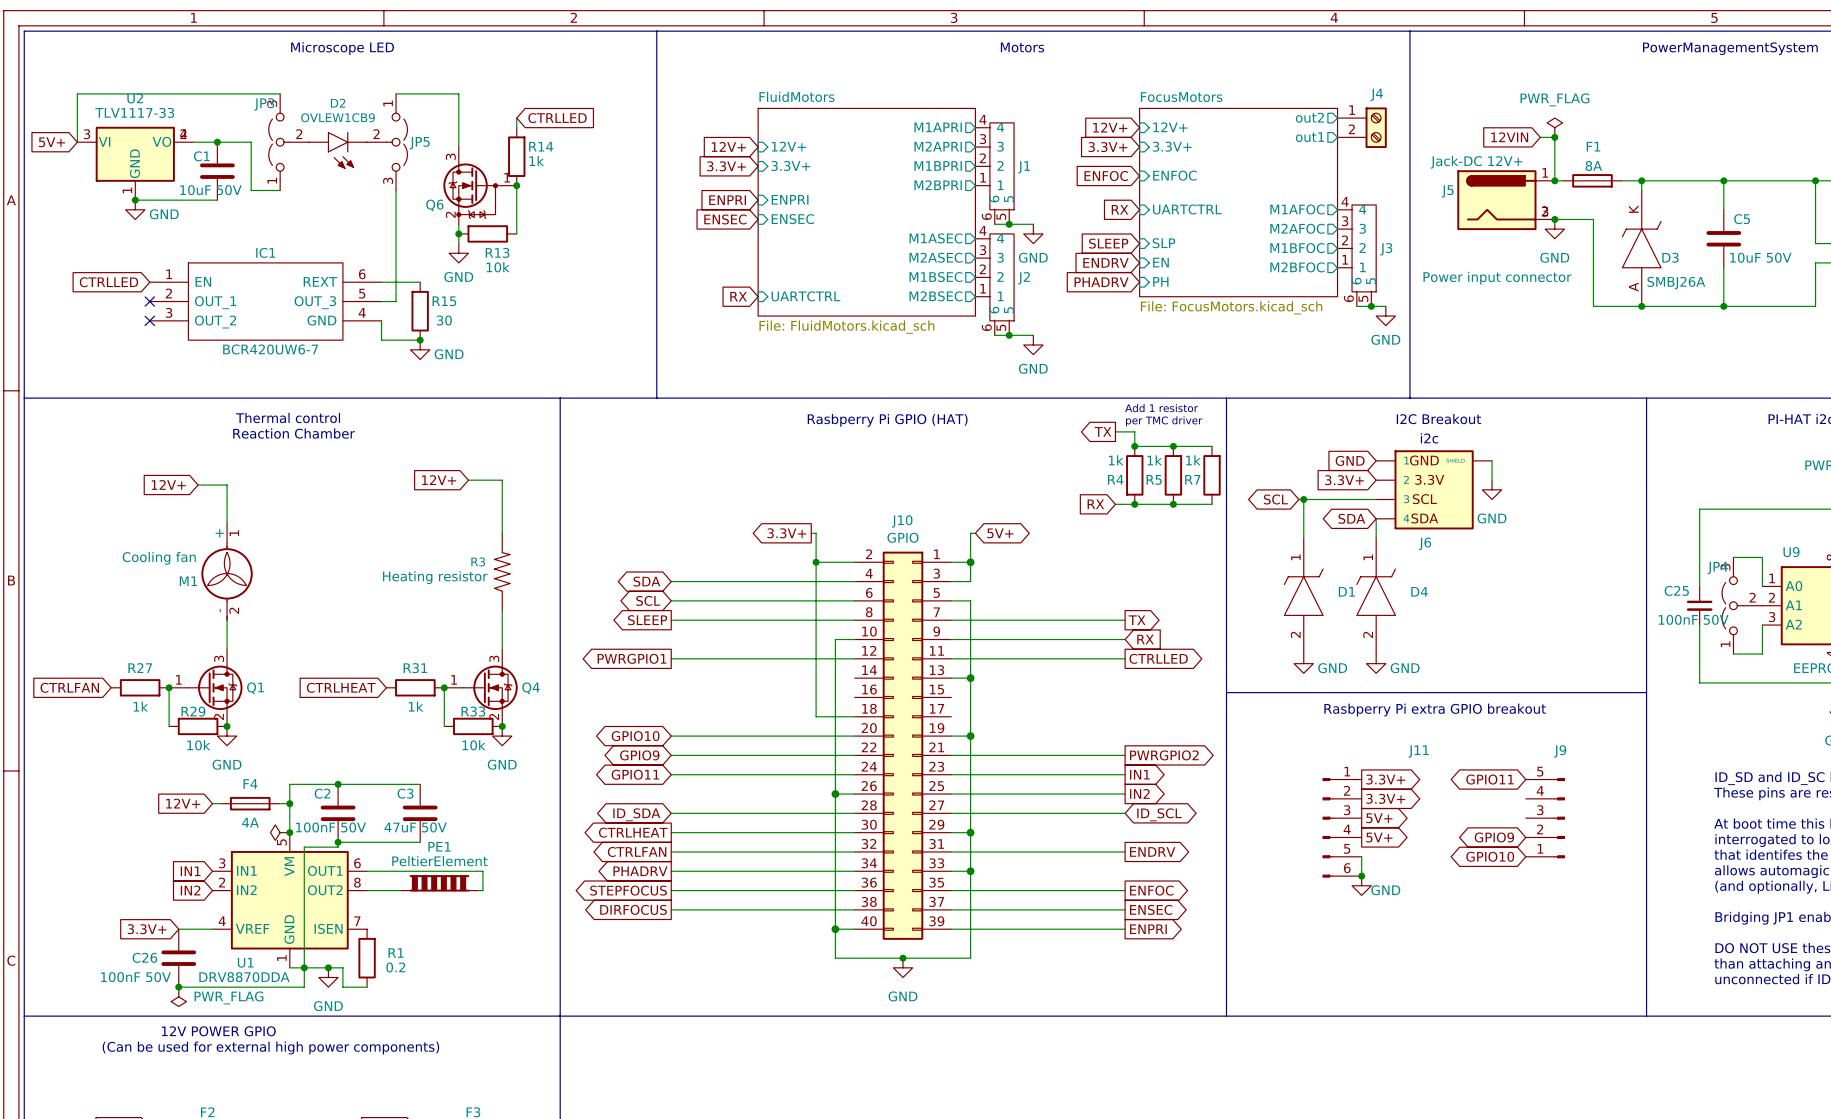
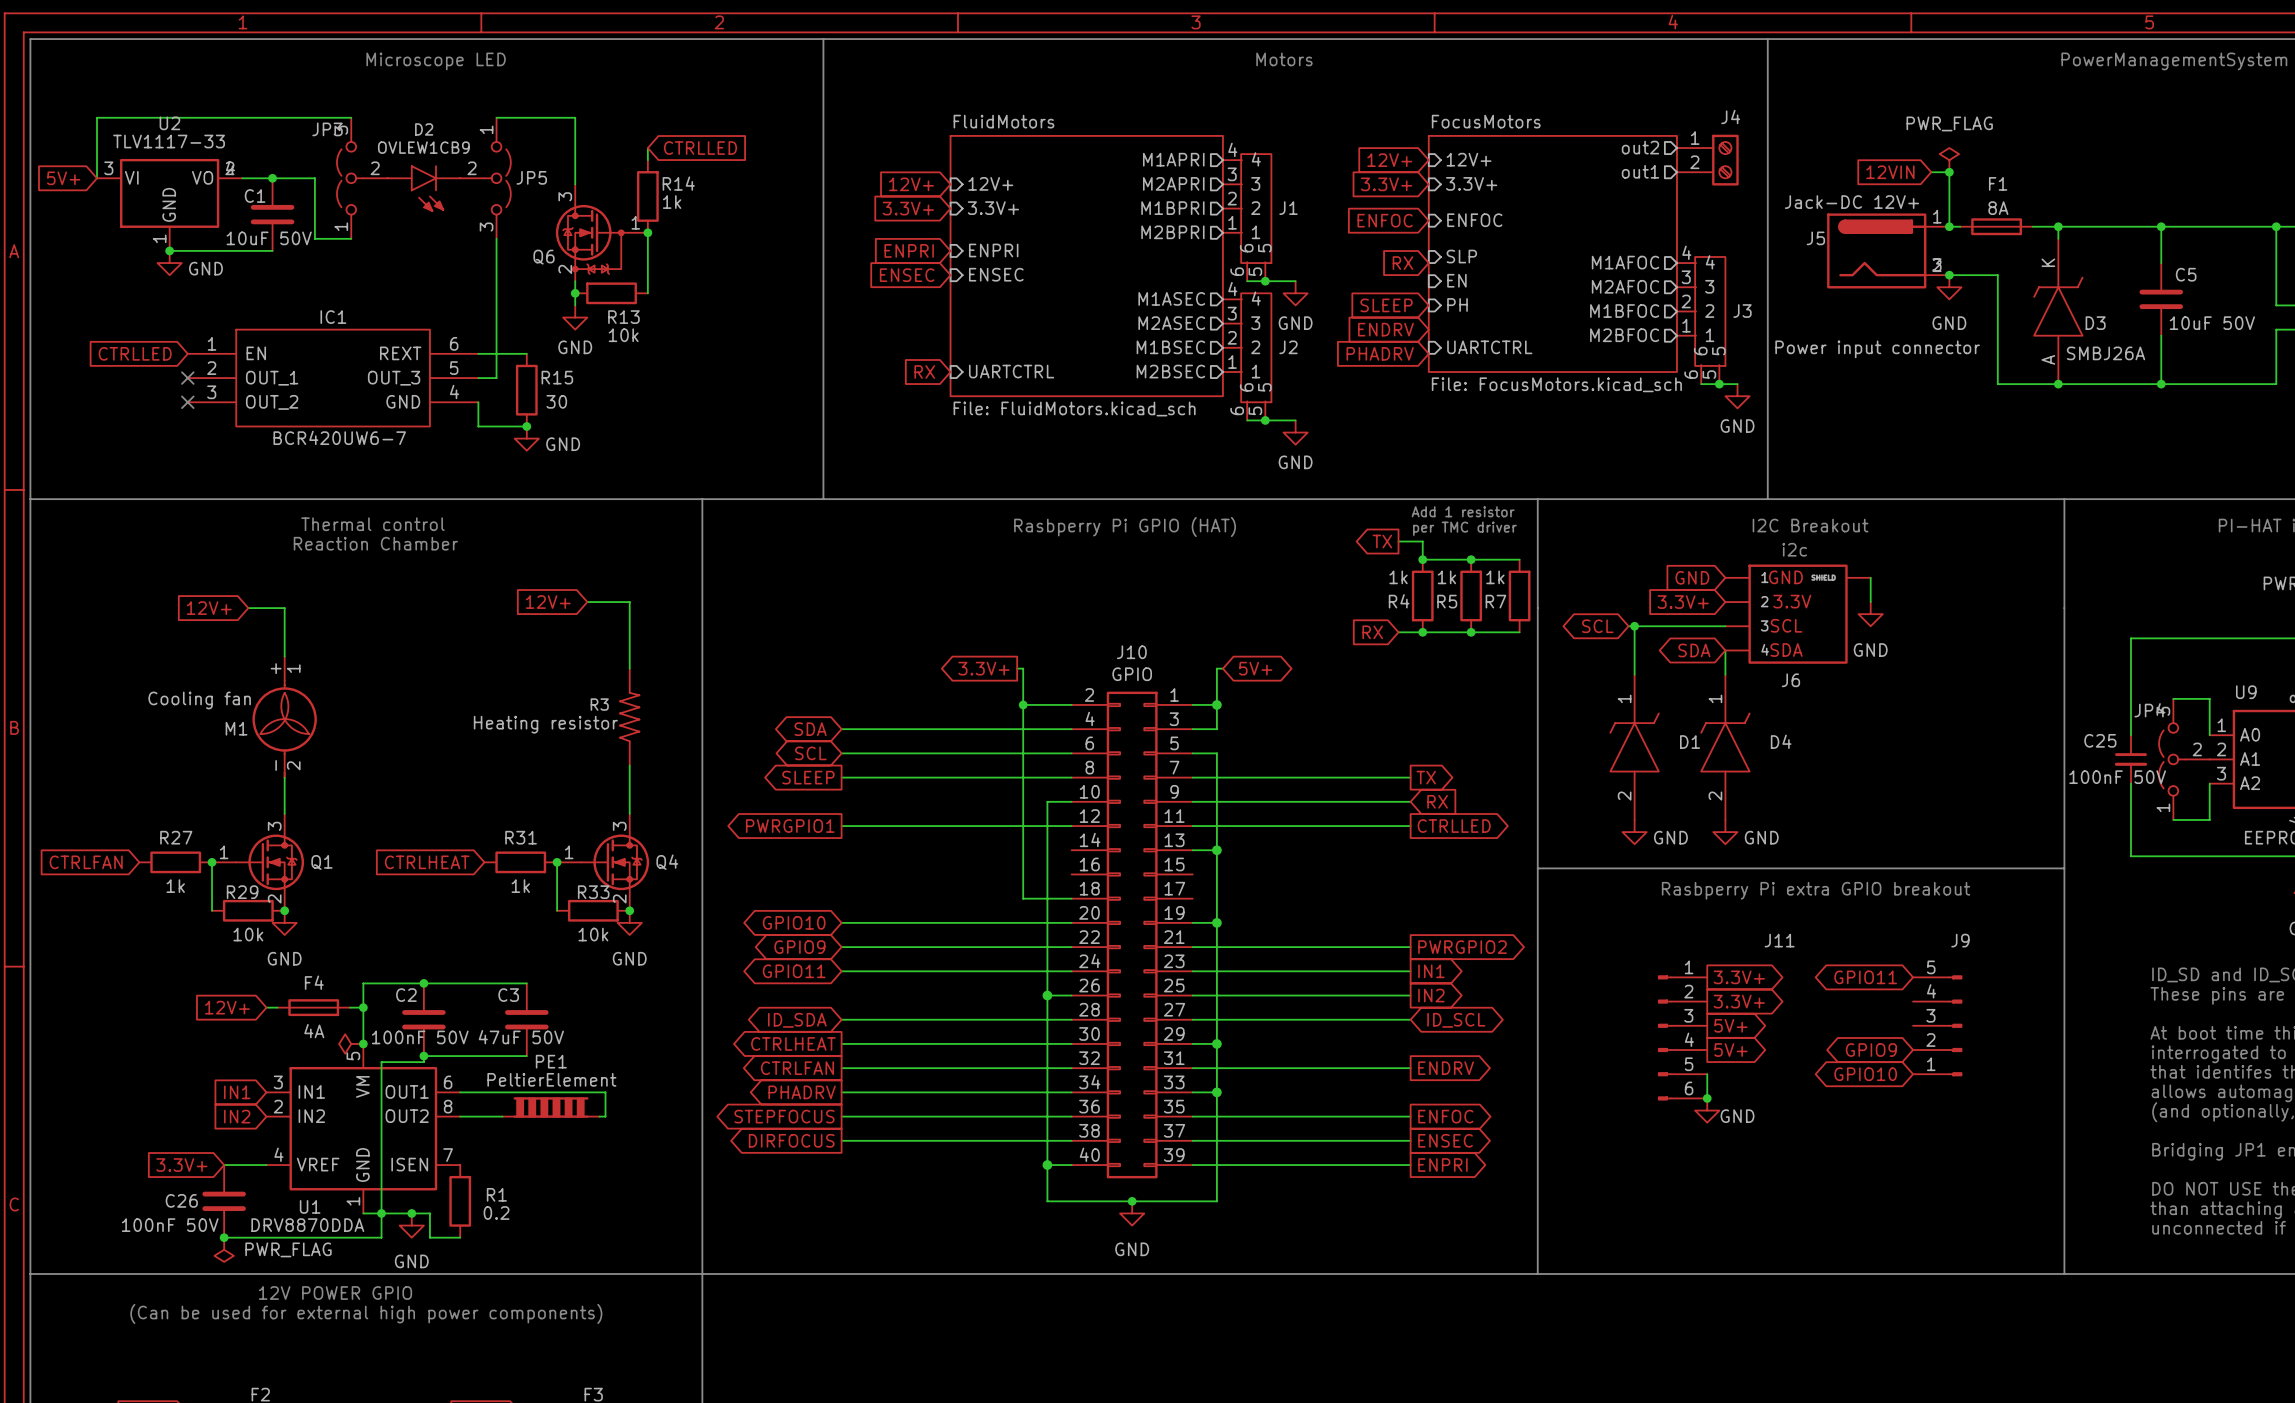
sheet pin: none -> SLP (1461, 256)
sheet pin position: UARTCTRL (1187, 209) -> UARTCTRL (1489, 347)
sheet pin: SLP (1163, 243) -> PH (1457, 304)
sheet pin position: EN (1160, 262) -> EN (1456, 280)
sheet pin: PH (1160, 281) -> none

